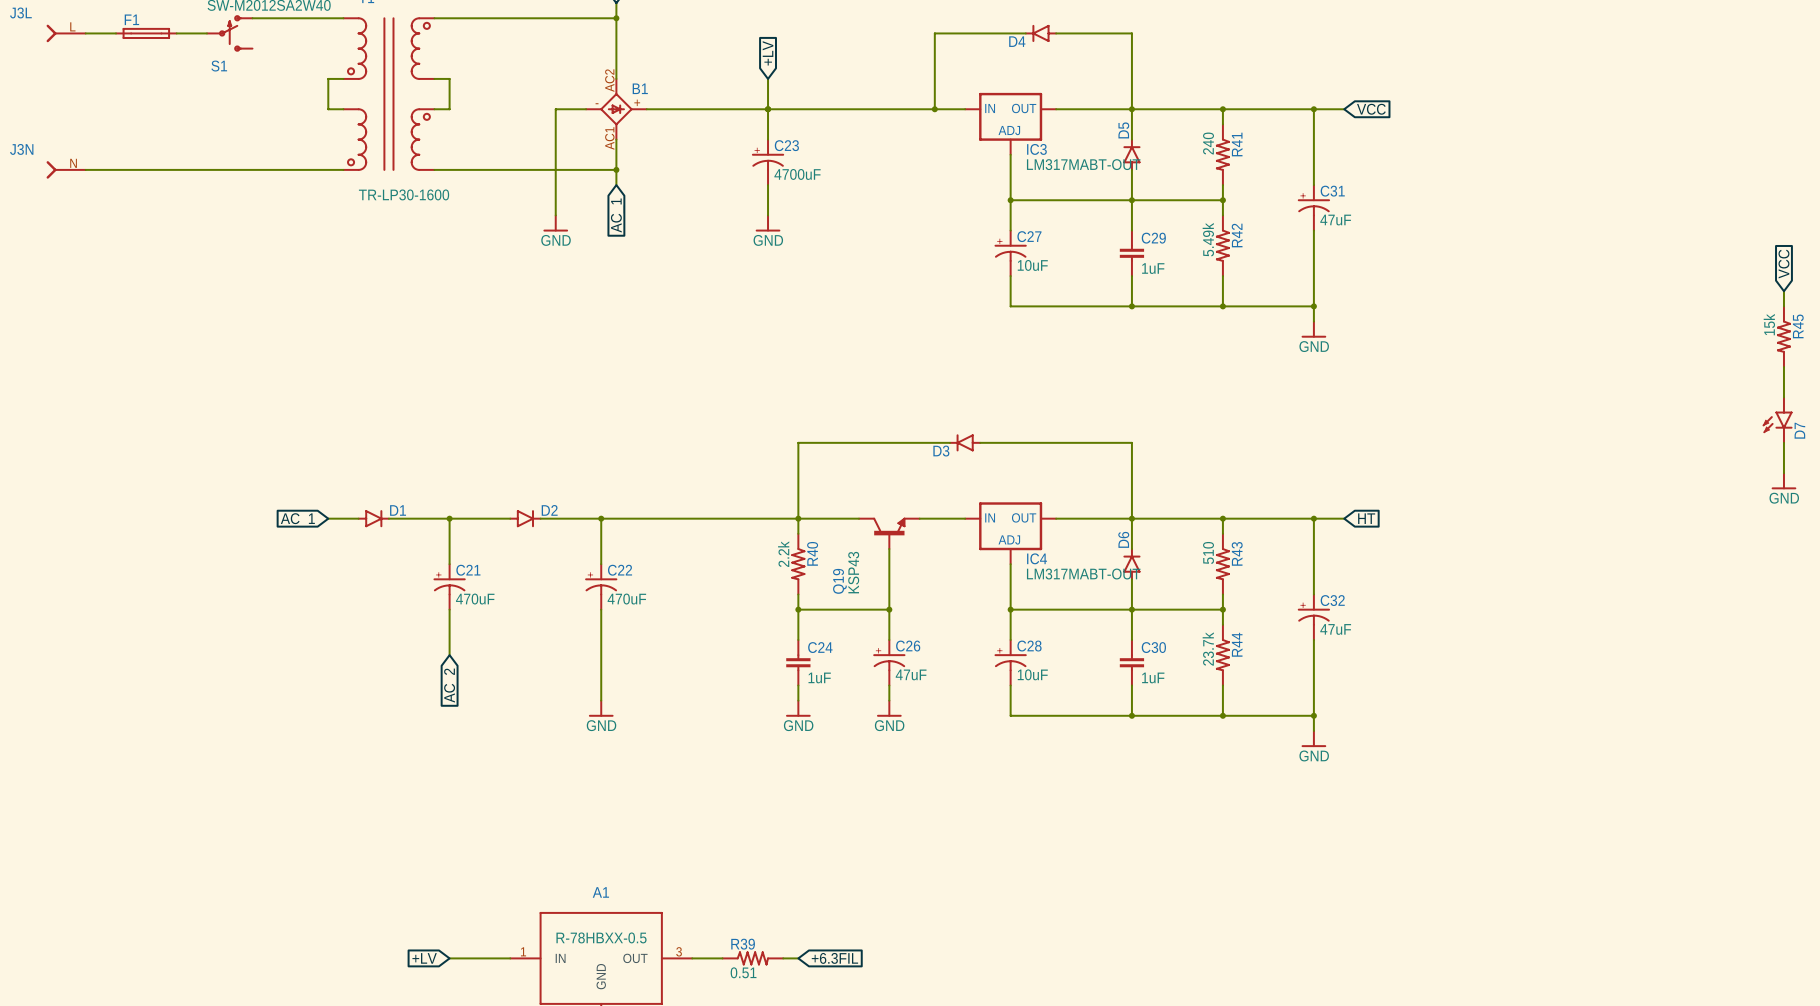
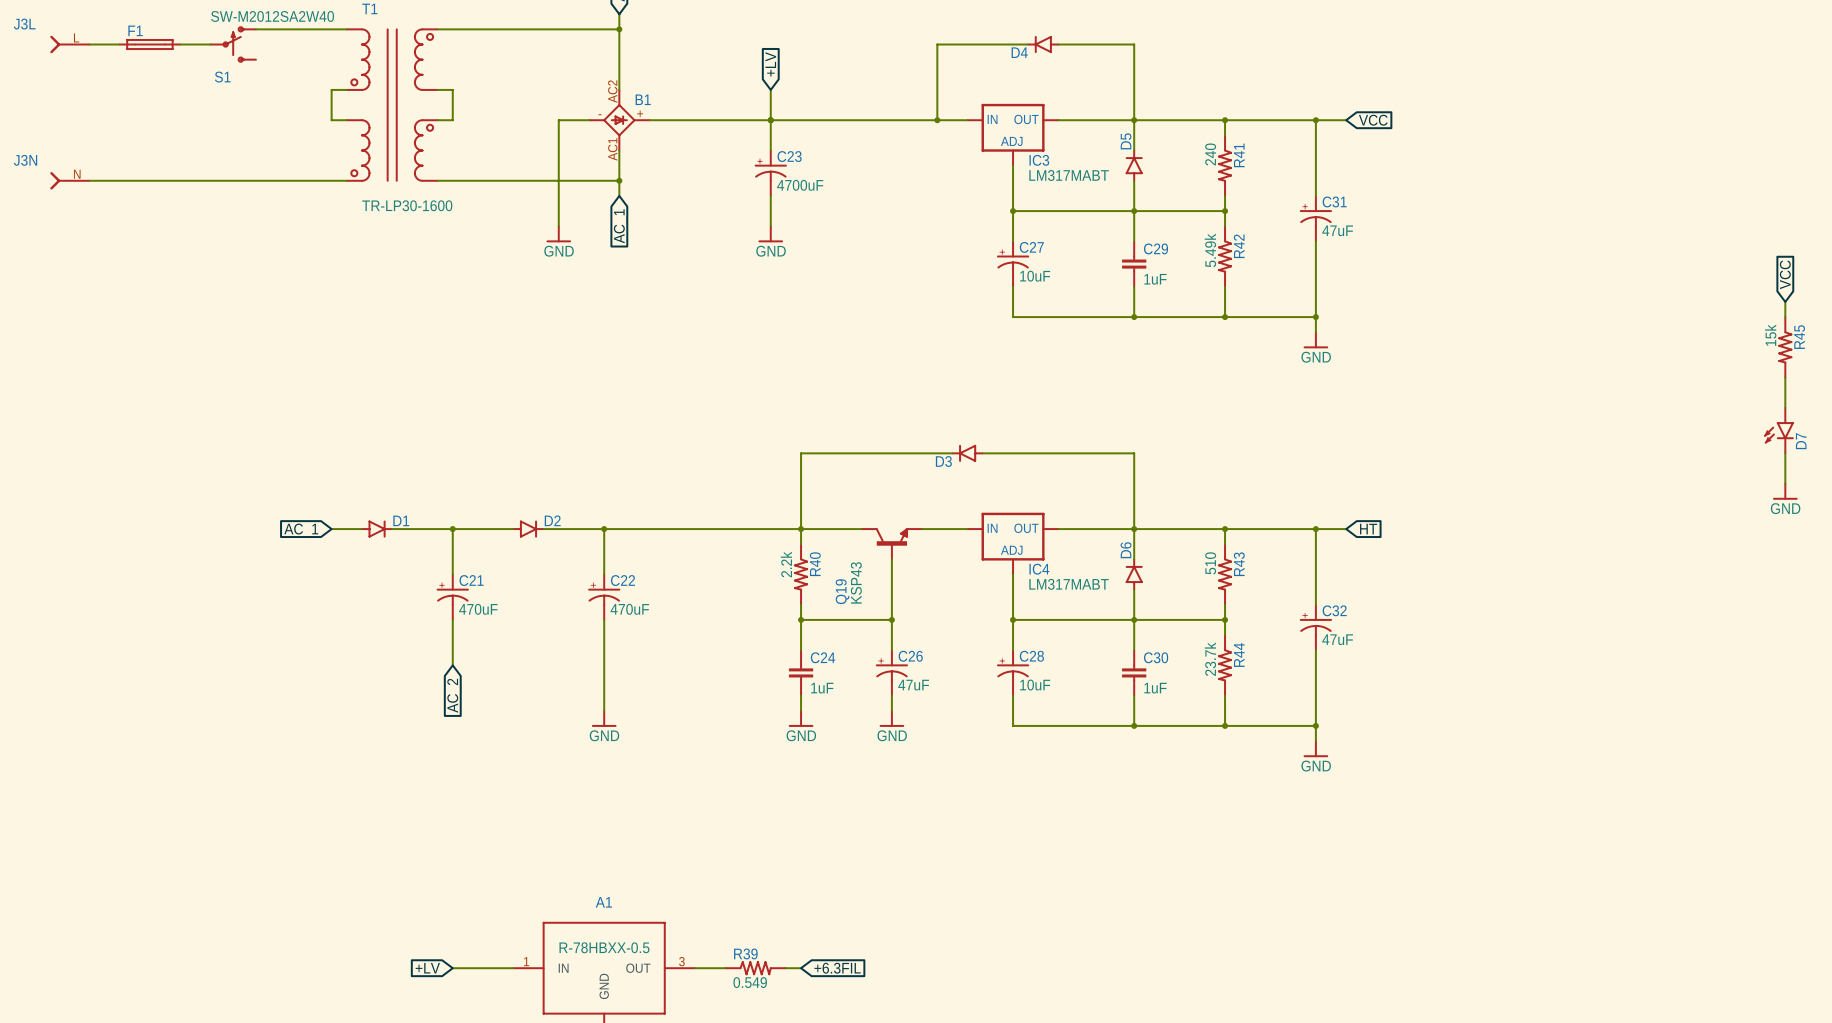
IC3 value: LM317MABT-OUT (1083, 164) -> LM317MABT (1069, 175)
IC4 value: LM317MABT-OUT (1083, 574) -> LM317MABT (1069, 584)
R39 value: 0.51 (743, 972) -> 0.549 (750, 982)

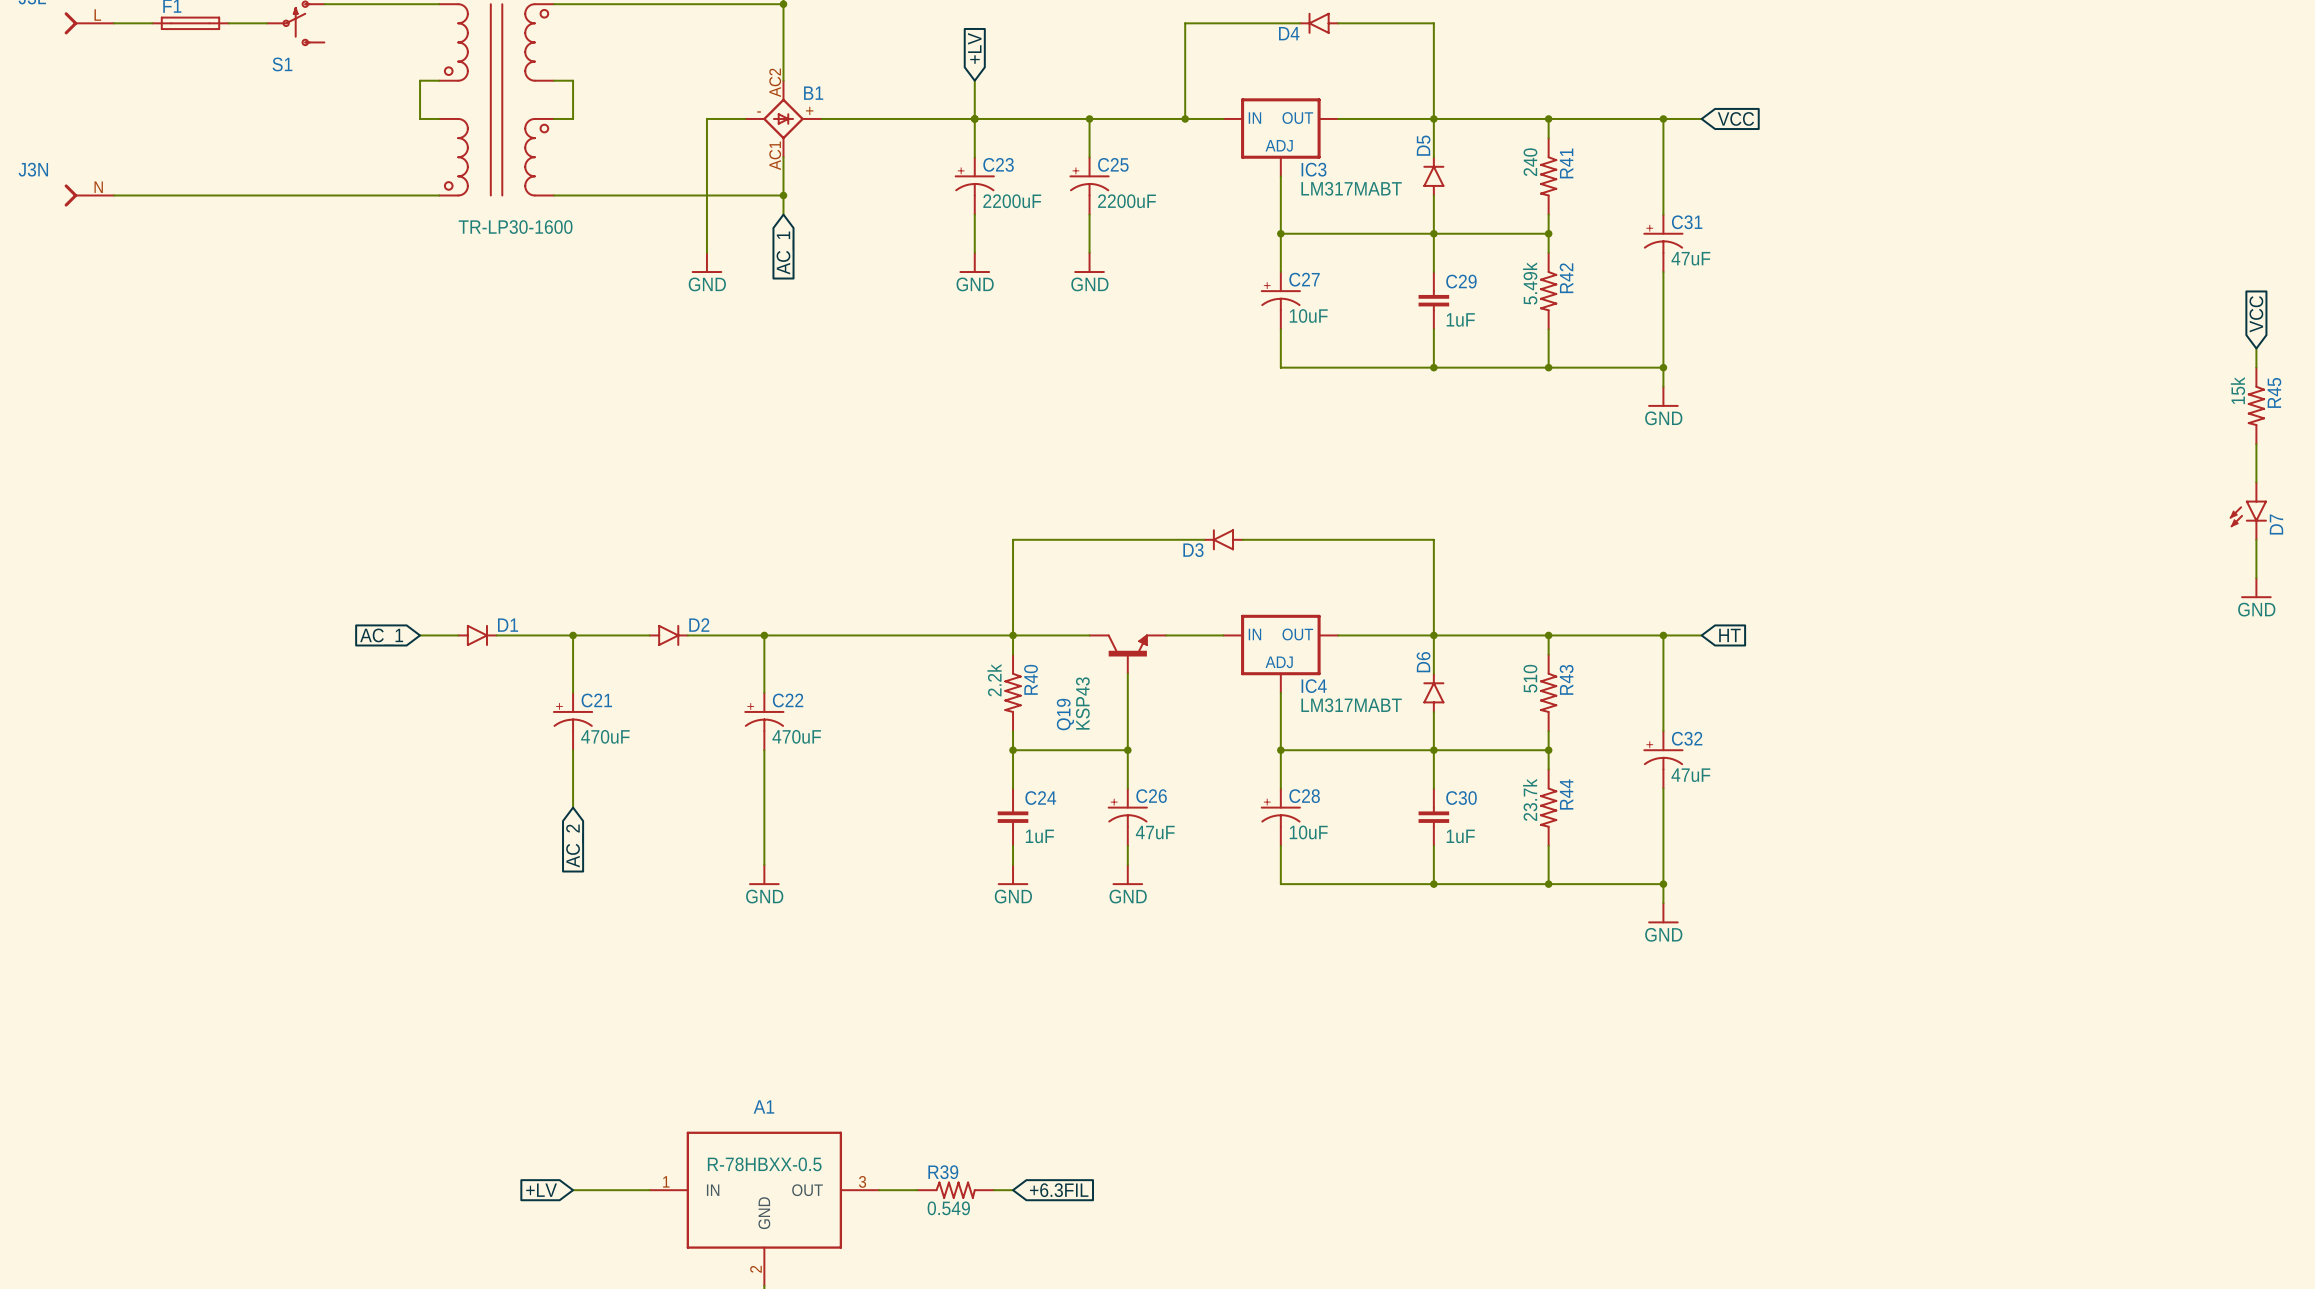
wire: none -> (1089, 118) (1089, 157)
junction: none -> (1089, 118)
C25: none -> 2200uF (1089, 185)
C23 value: 4700uF (800, 185) -> 2200uF (1012, 201)
wire: none -> (1089, 214) (1089, 252)
power symbol: none -> GND (1089, 262)

